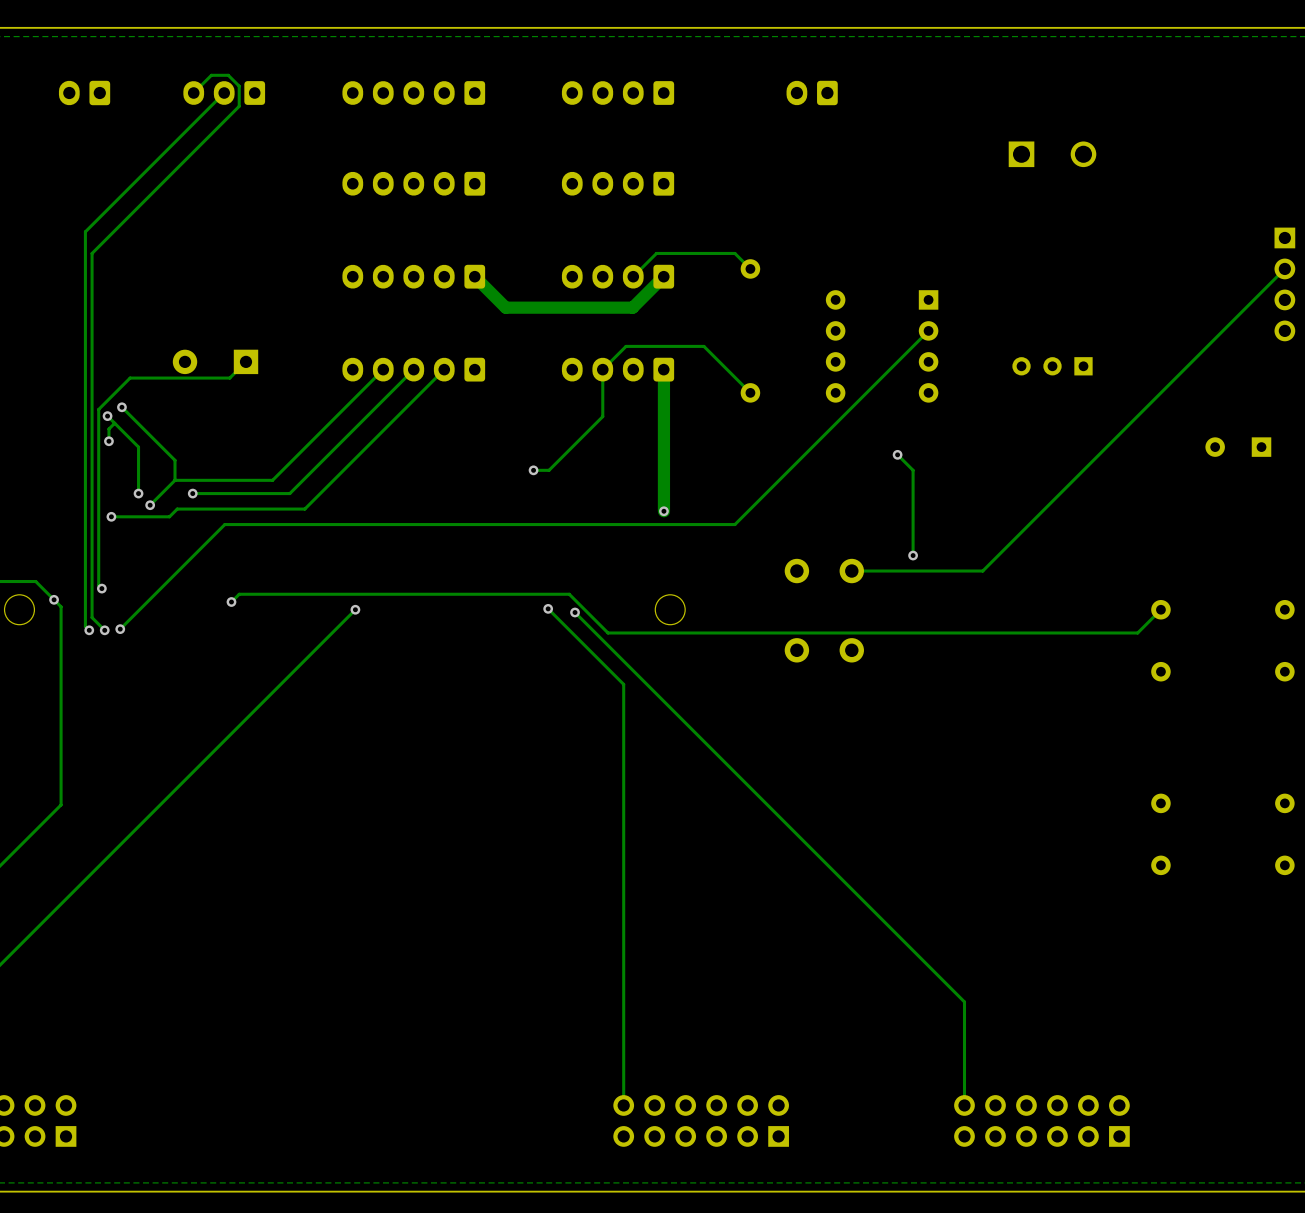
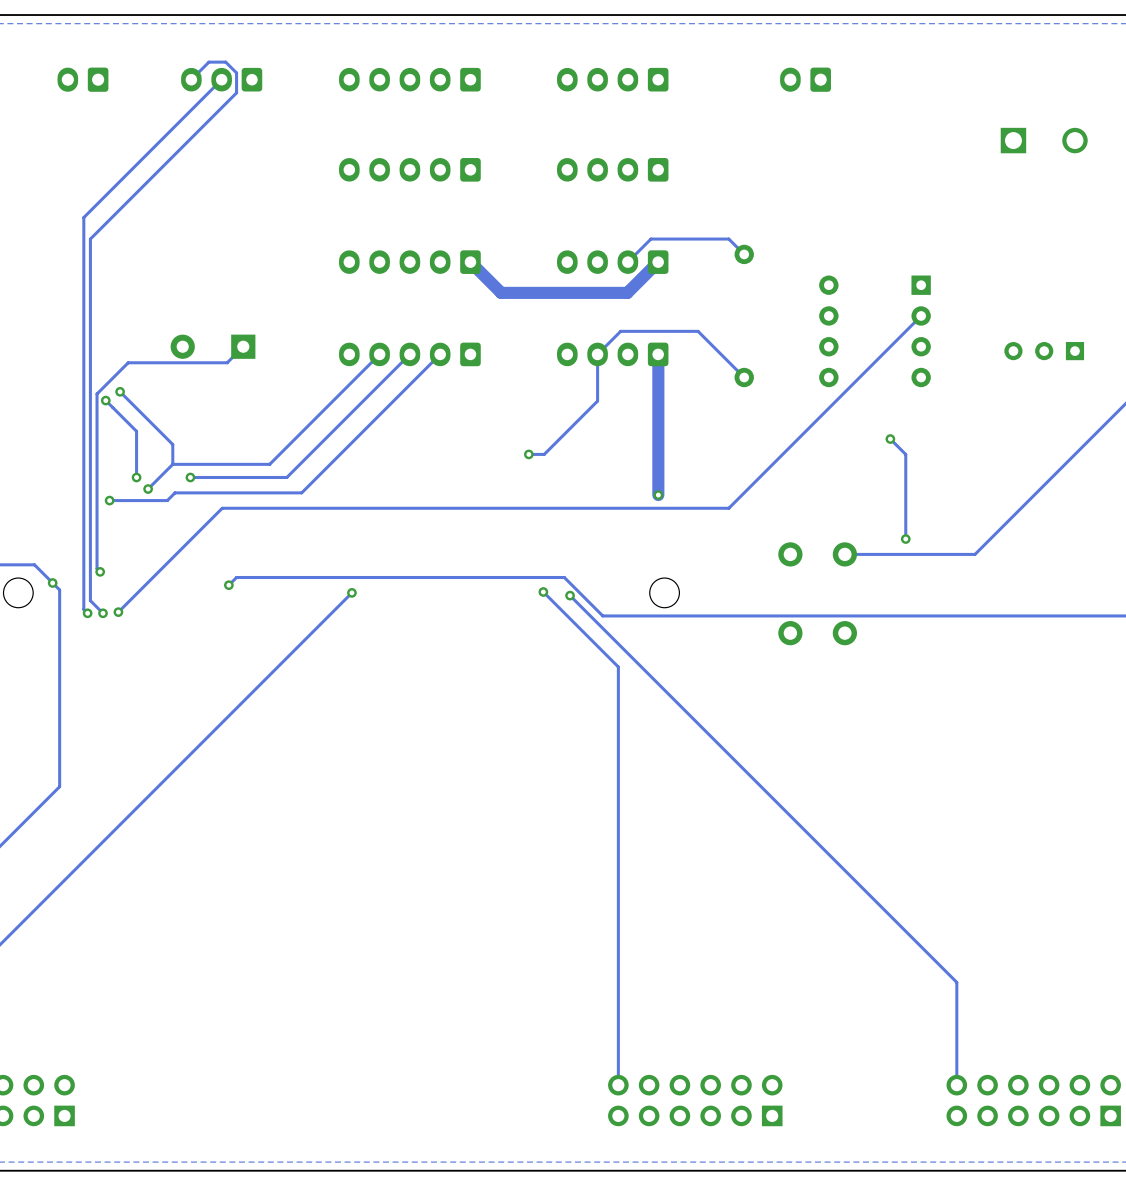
track: (114, 423) (108, 429) (108, 441) -> none
via: (108, 441) -> none

